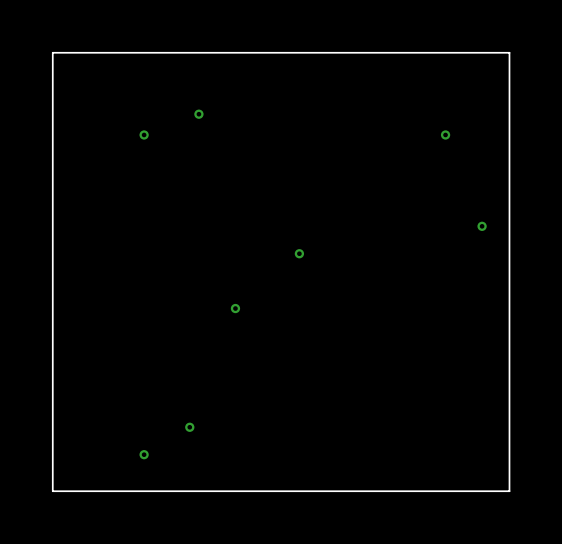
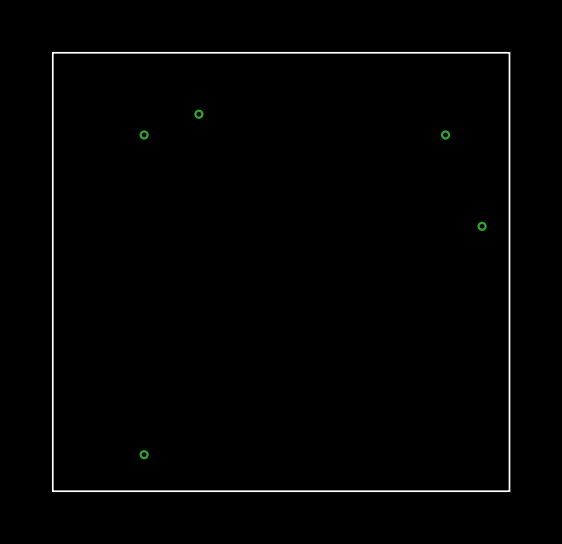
via: (299, 253) -> none
via: (235, 308) -> none
via: (189, 427) -> none

